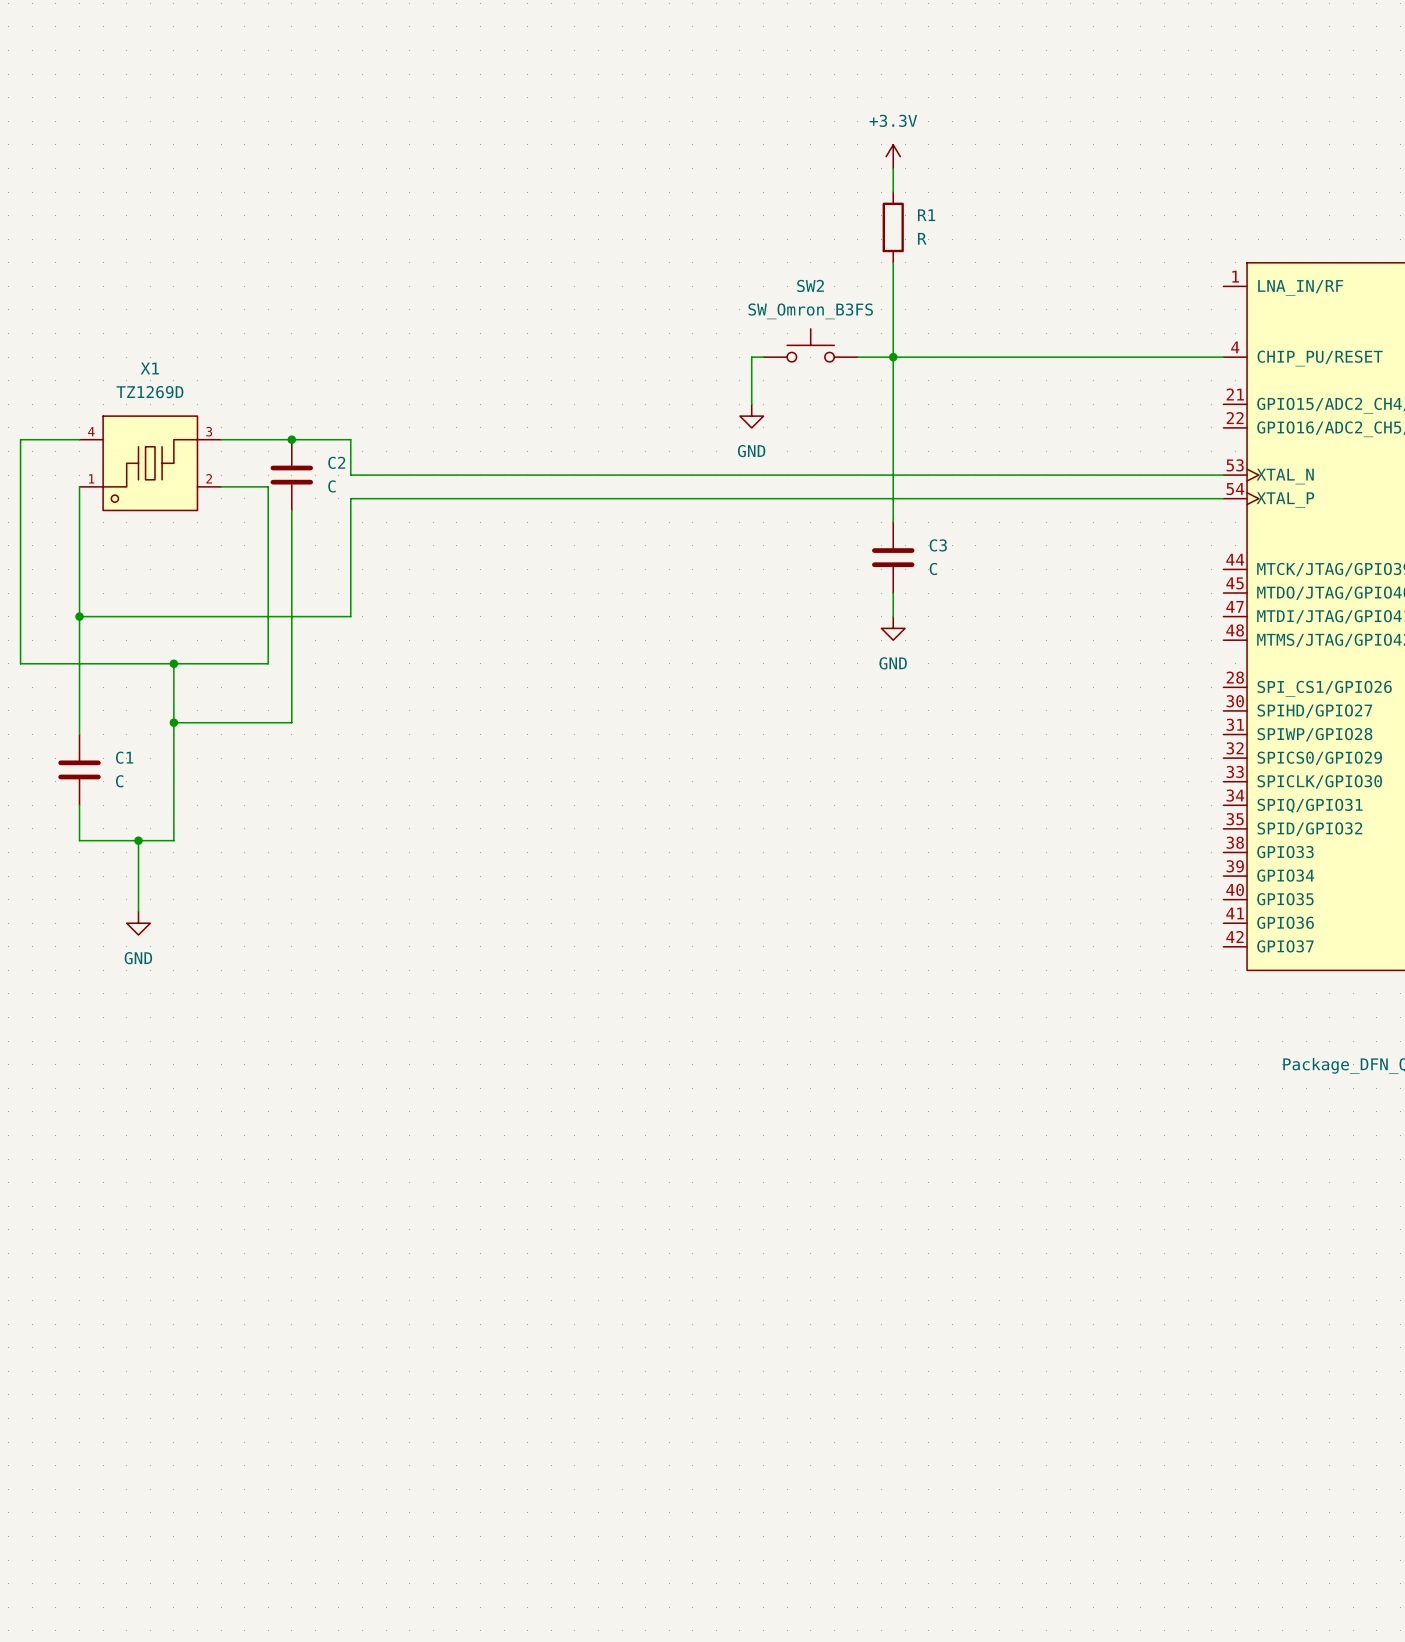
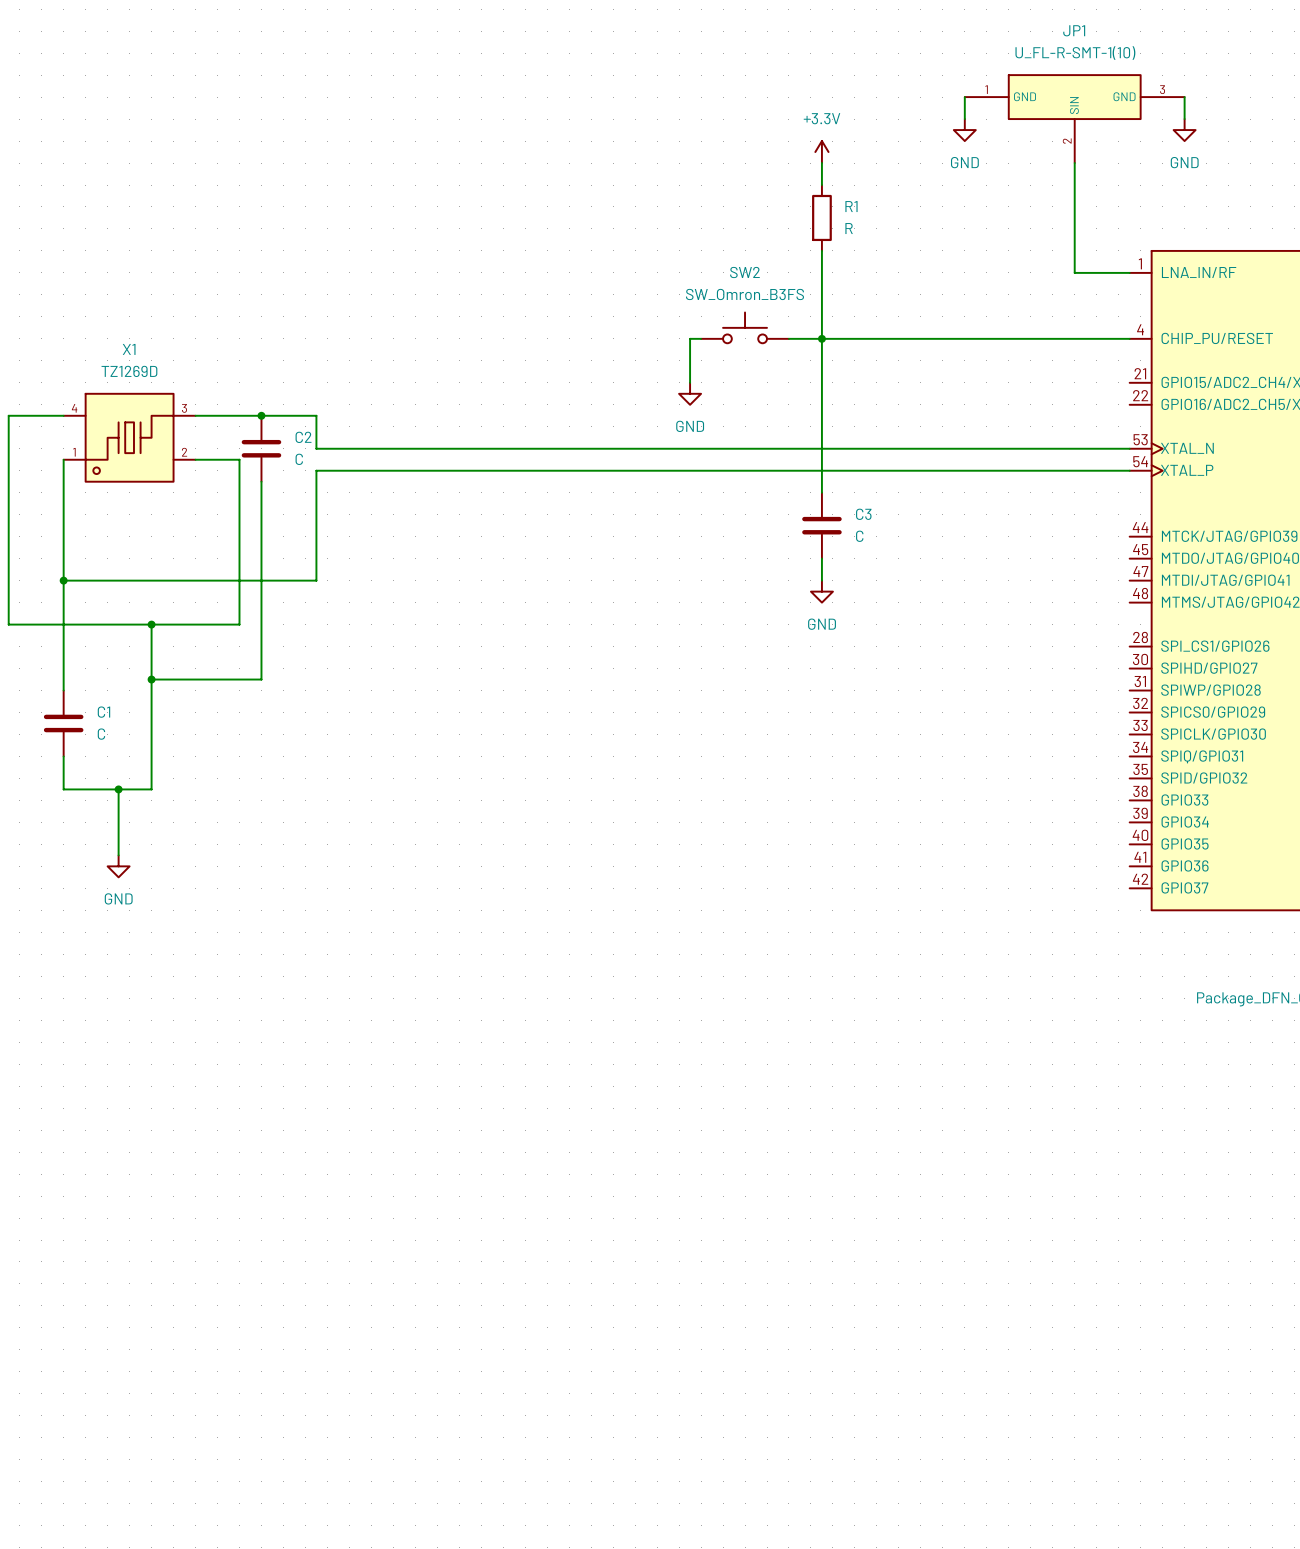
wire: none -> (964, 97) (964, 119)
wire: none -> (1184, 97) (1184, 119)
JP1: none -> U_FL-R-SMT-1(10) (1074, 119)
power symbol: none -> GND (964, 130)
power symbol: none -> GND (1184, 130)
wire: none -> (1074, 163) (1074, 272) (1129, 272)

